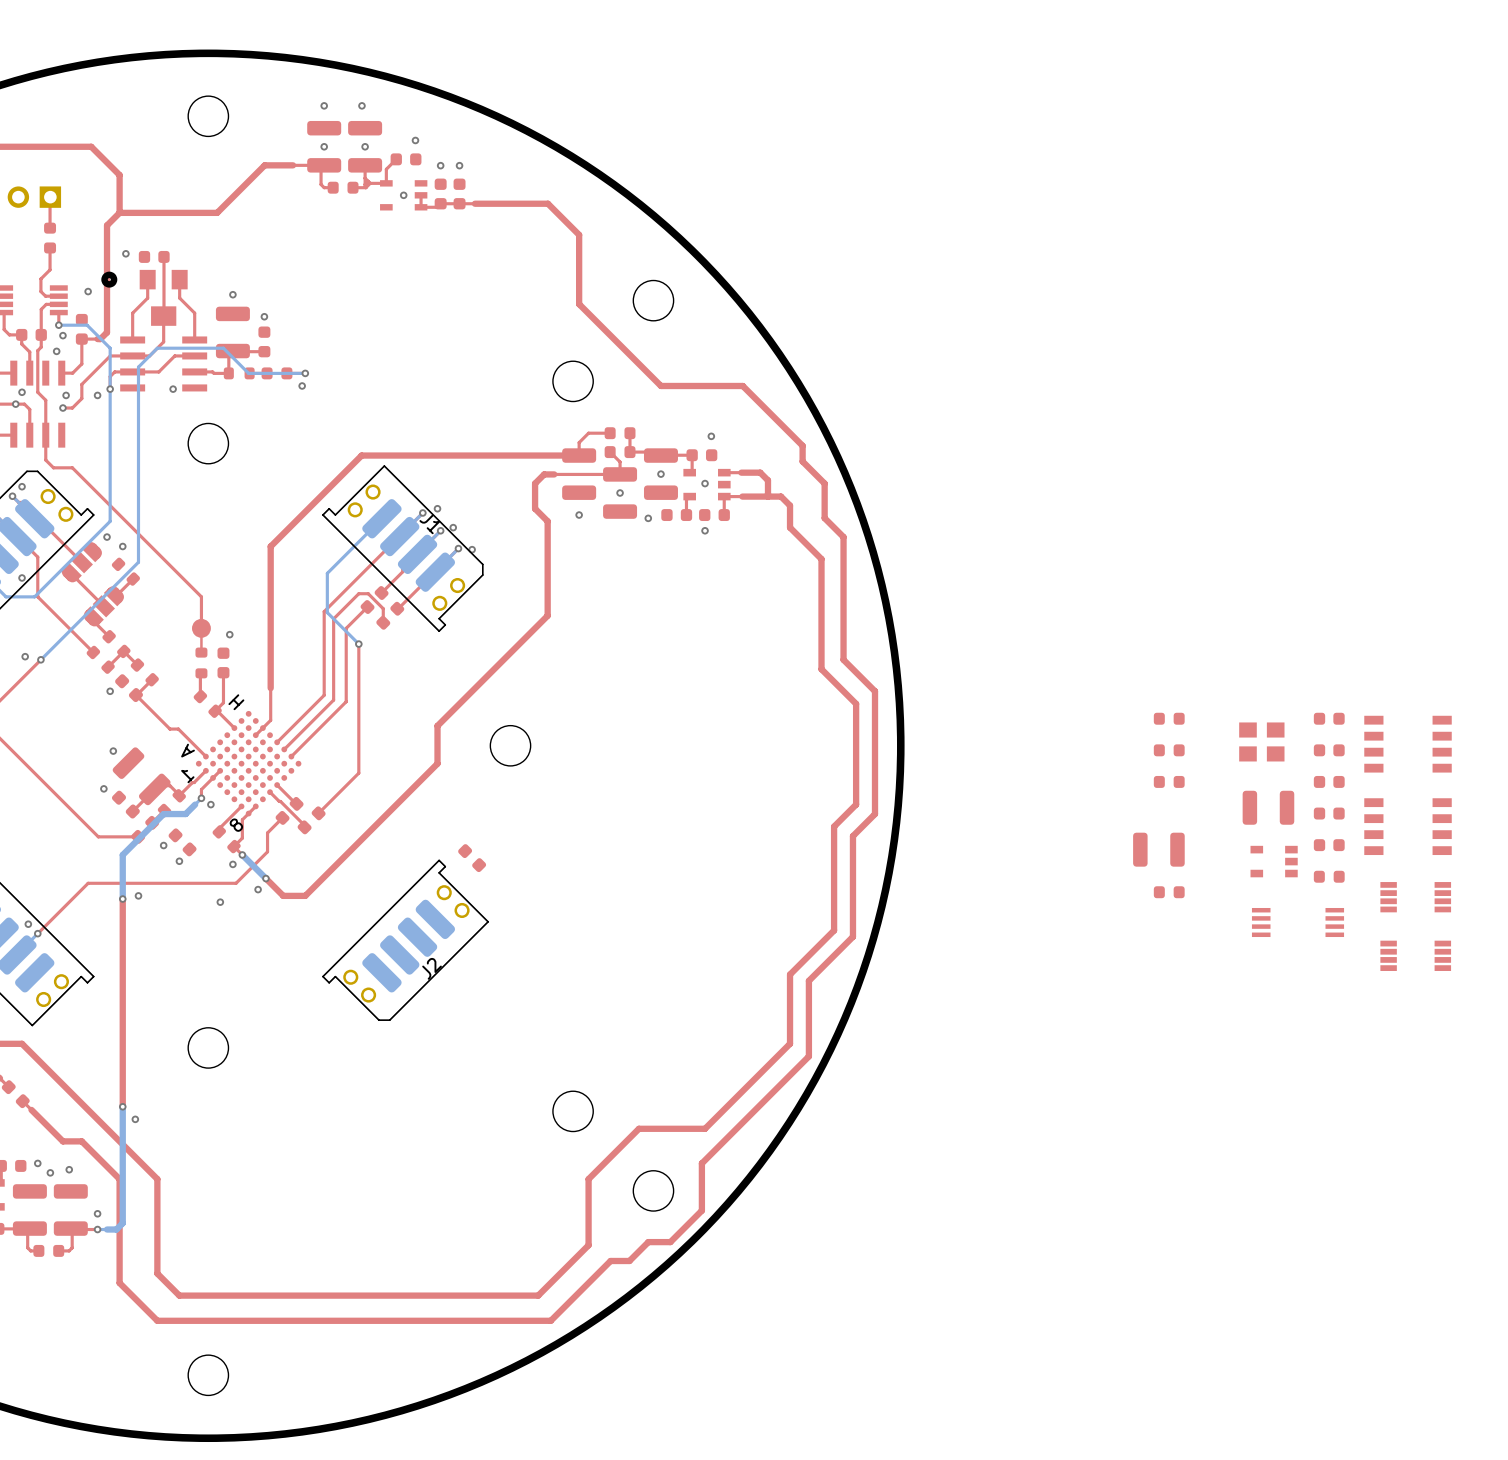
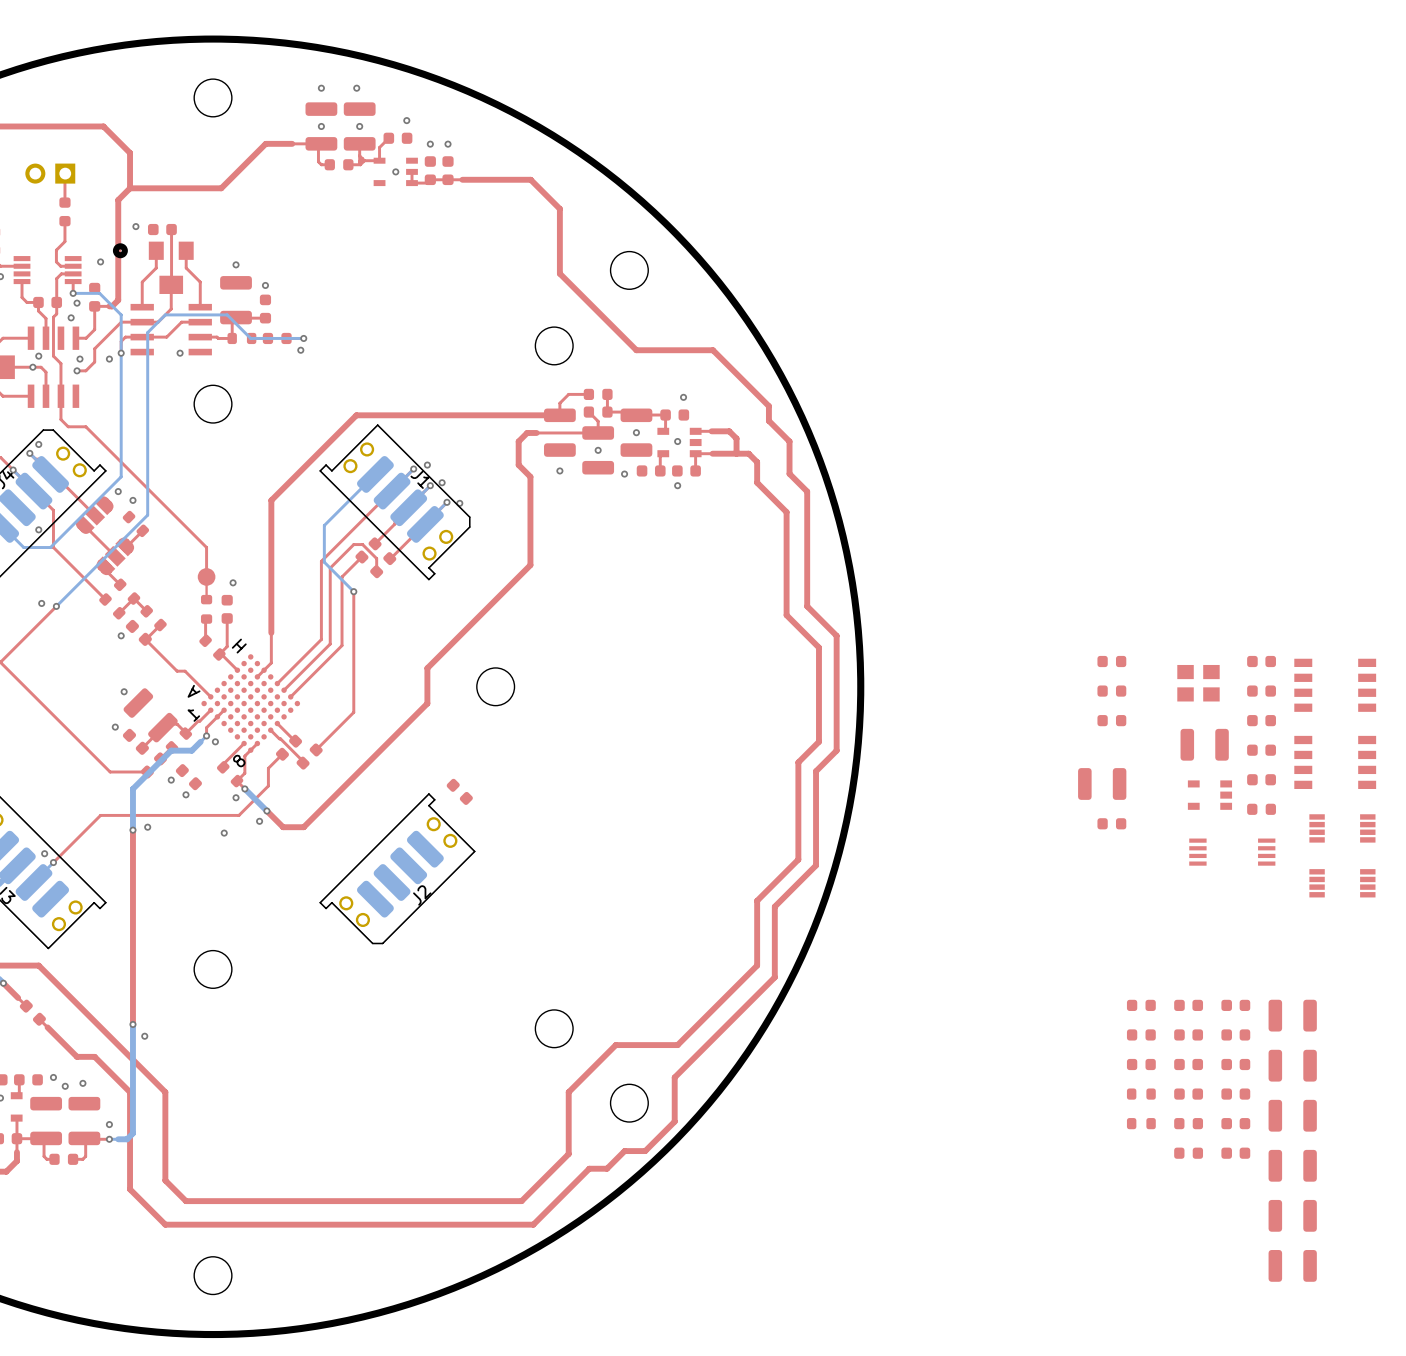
part: none -> (1141, 1005)
part: none -> (1188, 1005)
part: none -> (1235, 1005)
part: none -> (1292, 1015)
part: none -> (1141, 1034)
part: none -> (1188, 1034)
part: none -> (1235, 1034)
part: none -> (1141, 1064)
part: none -> (1188, 1064)
part: none -> (1235, 1064)
part: none -> (1292, 1065)
part: none -> (1141, 1094)
part: none -> (1188, 1094)
part: none -> (1235, 1094)
part: none -> (1292, 1115)
part: none -> (1141, 1123)
part: none -> (1188, 1123)
part: none -> (1235, 1123)
part: none -> (1188, 1153)
part: none -> (1235, 1153)
part: none -> (1292, 1165)
part: none -> (1292, 1215)
part: none -> (1292, 1265)

